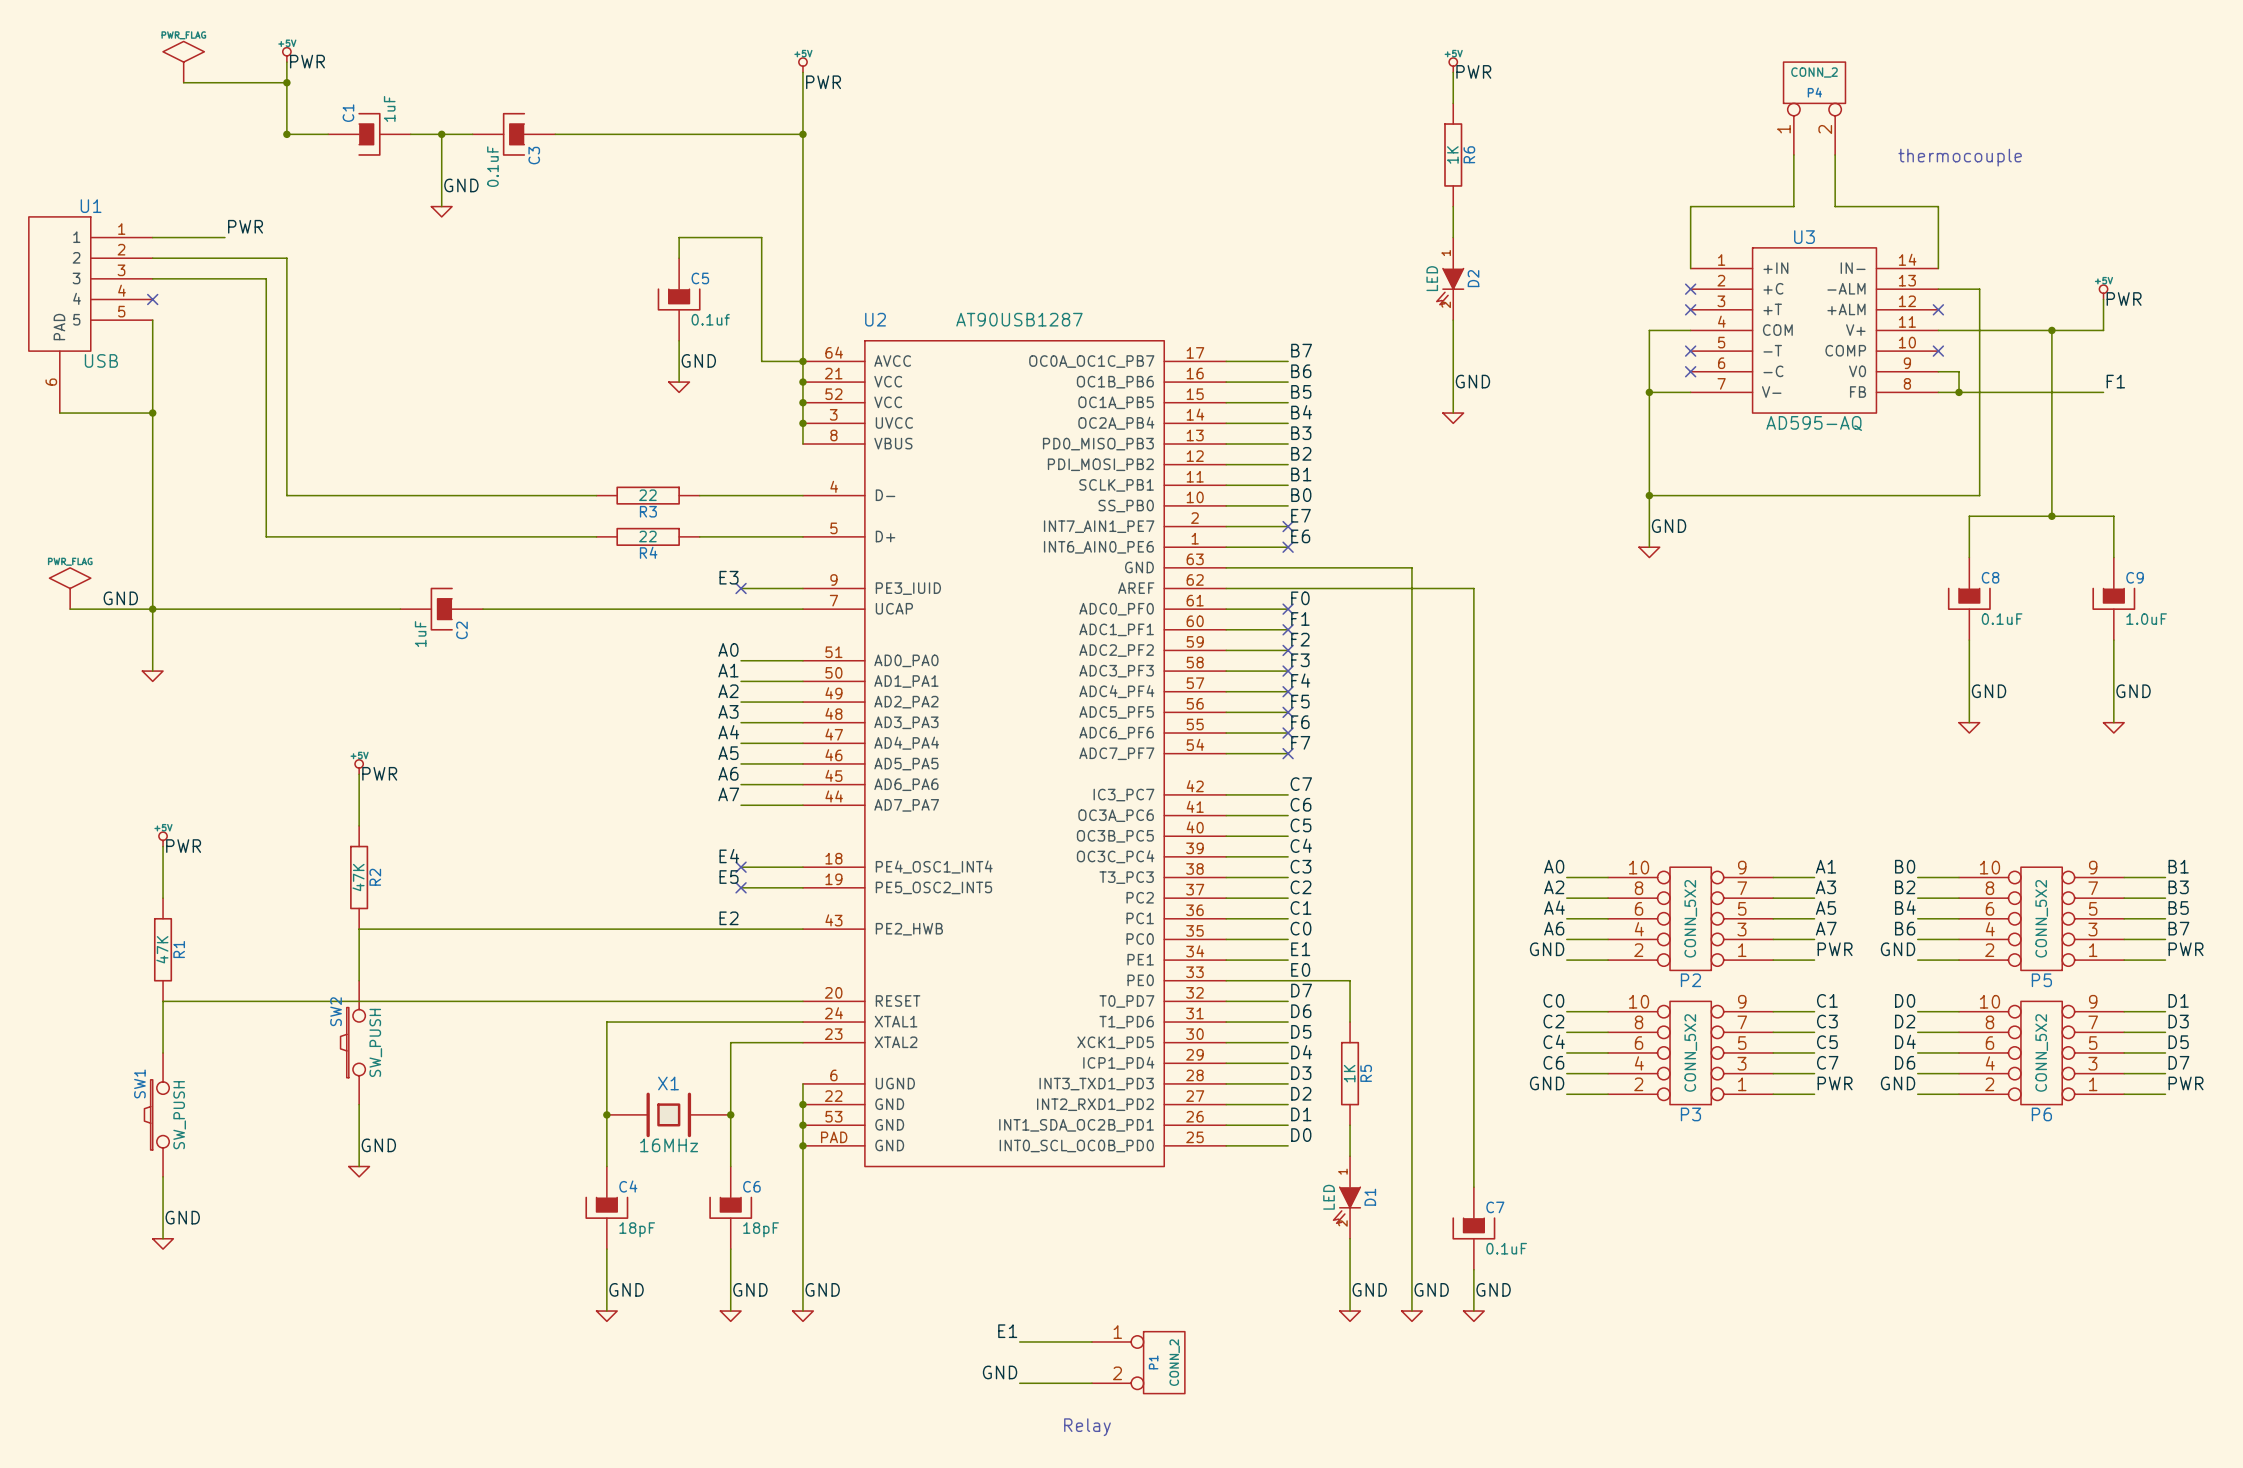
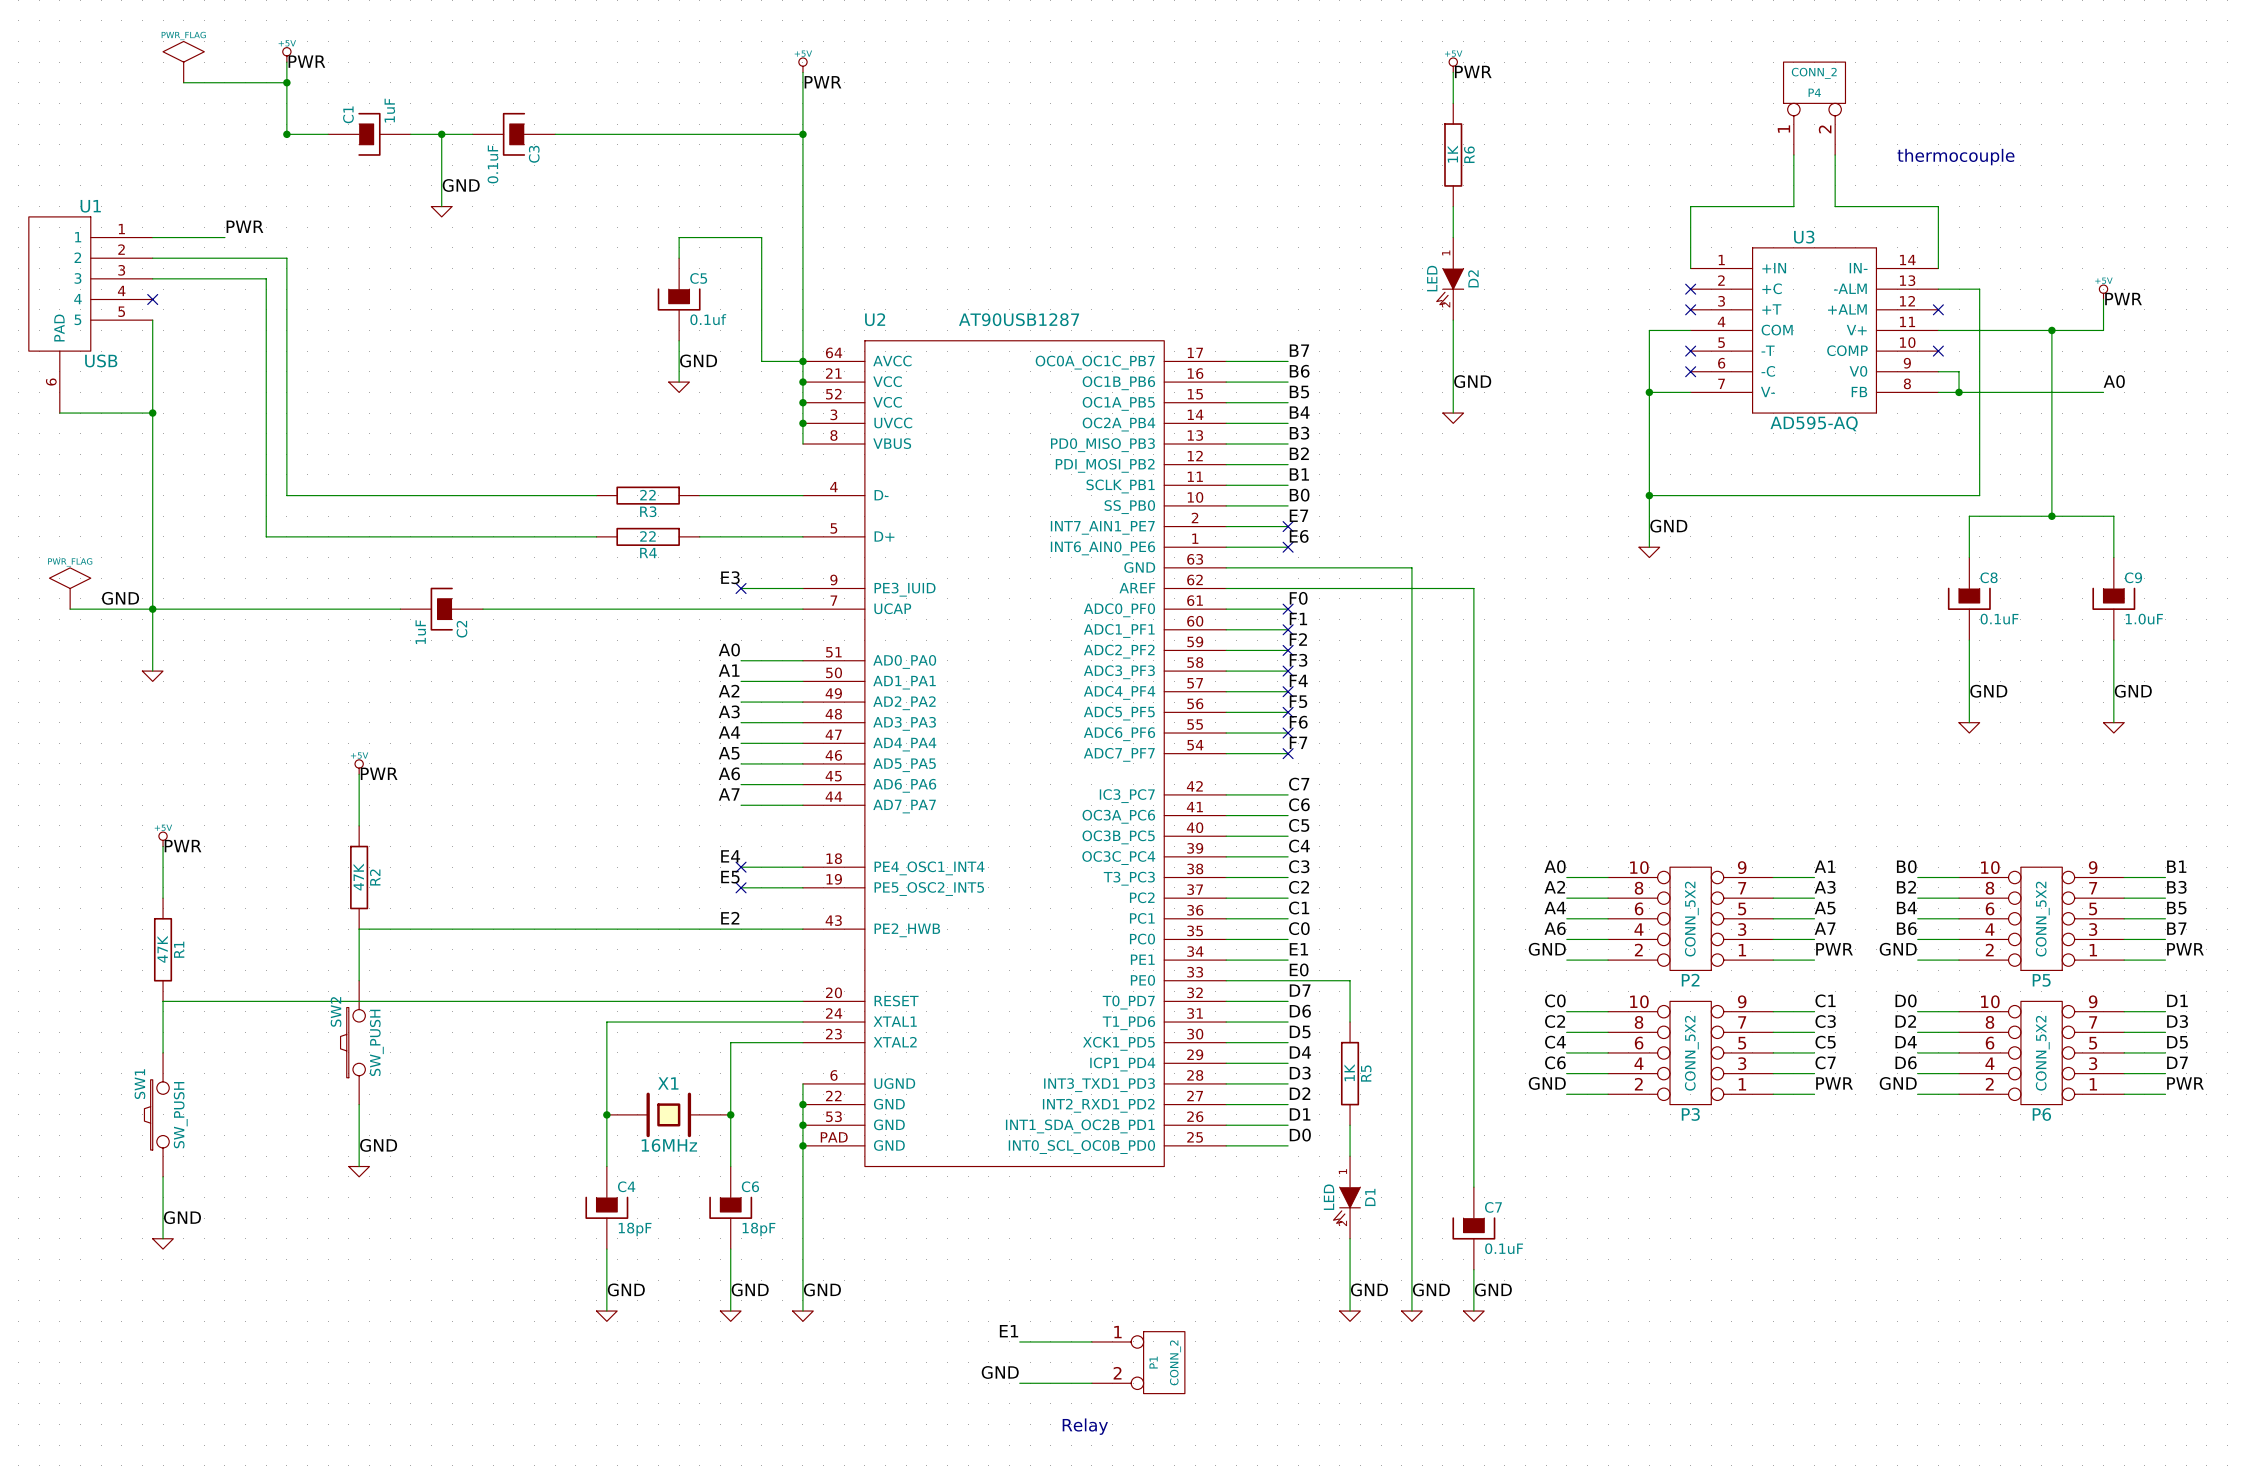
label: F1 (2115, 381) -> A0 (2114, 381)

